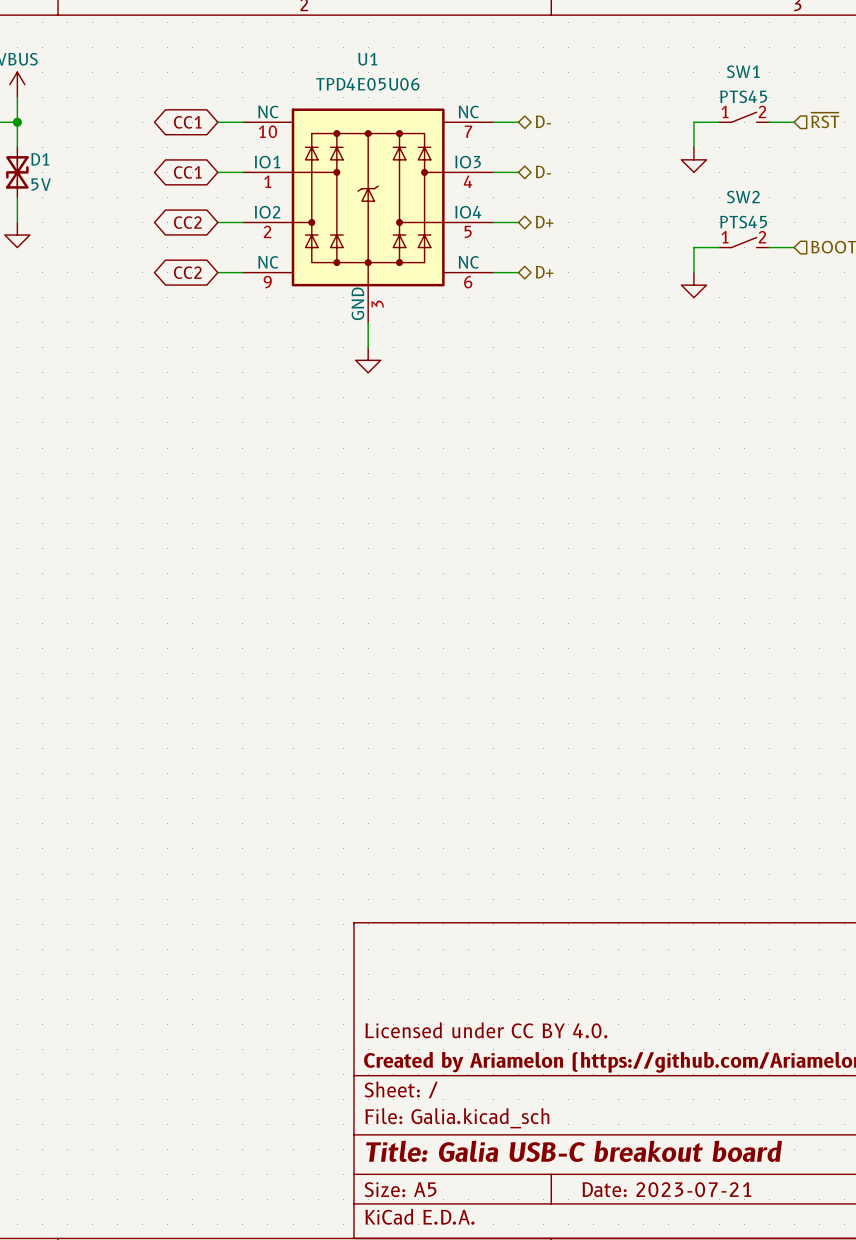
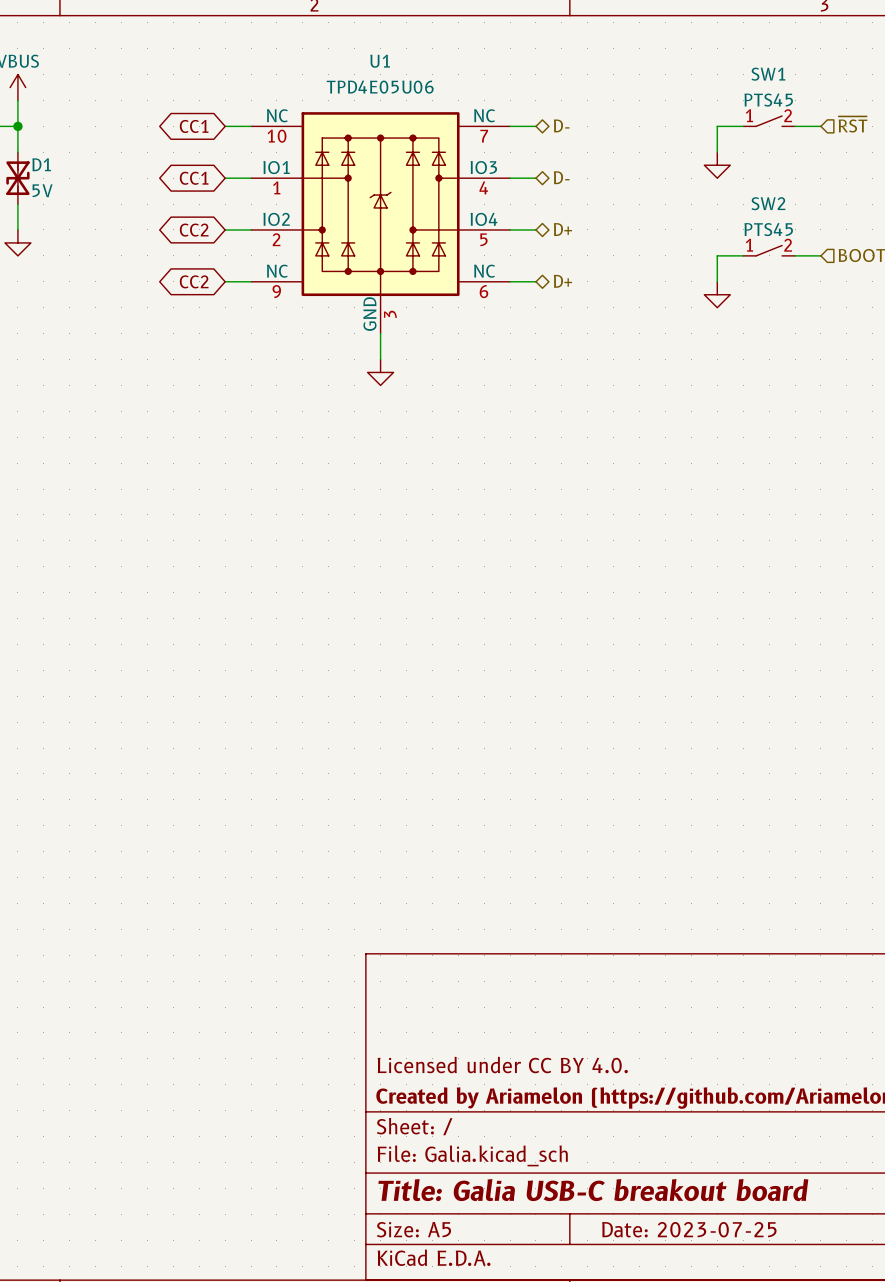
title block: Date: 2023-07-21 (666, 1189) -> Date: 2023-07-25 (689, 1229)

